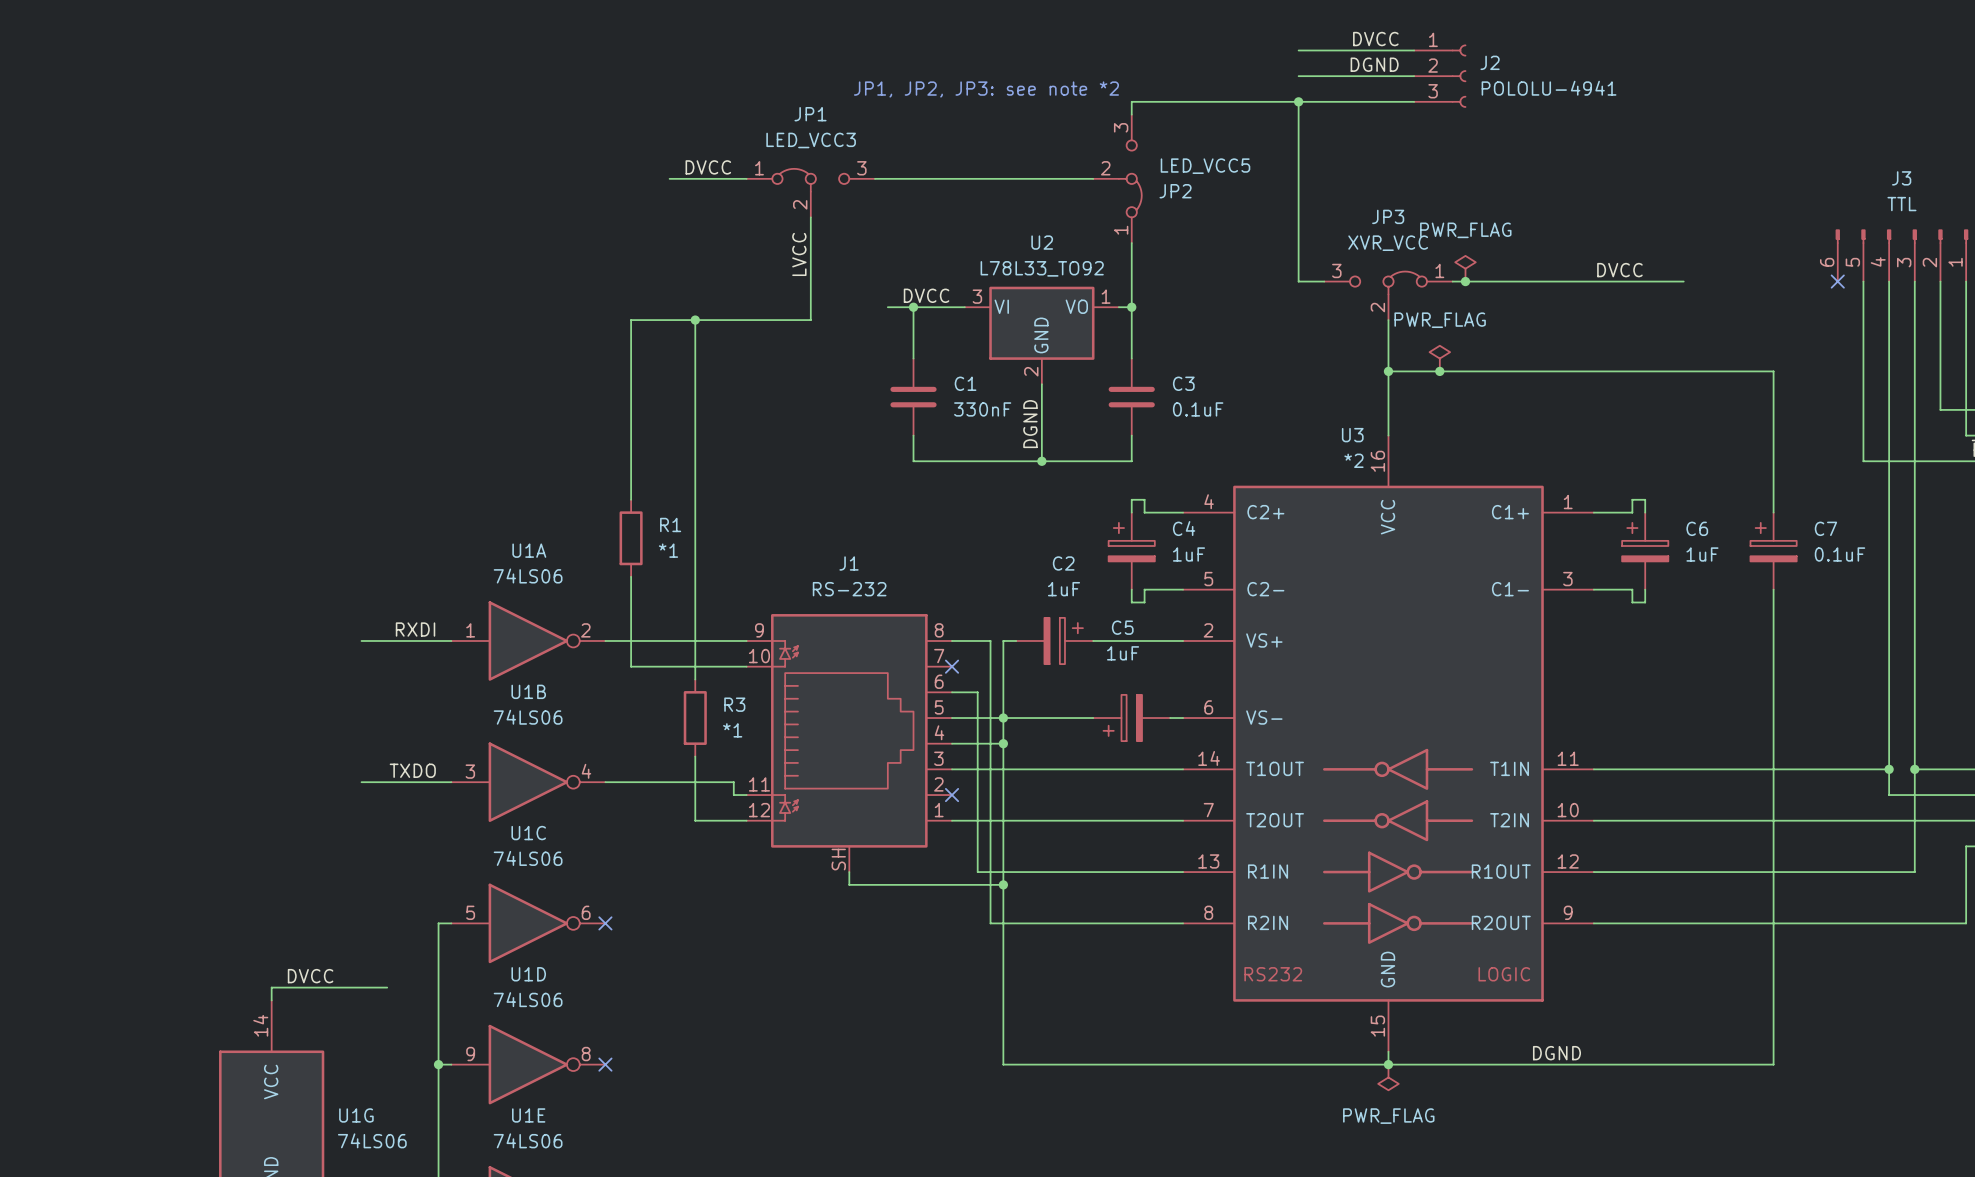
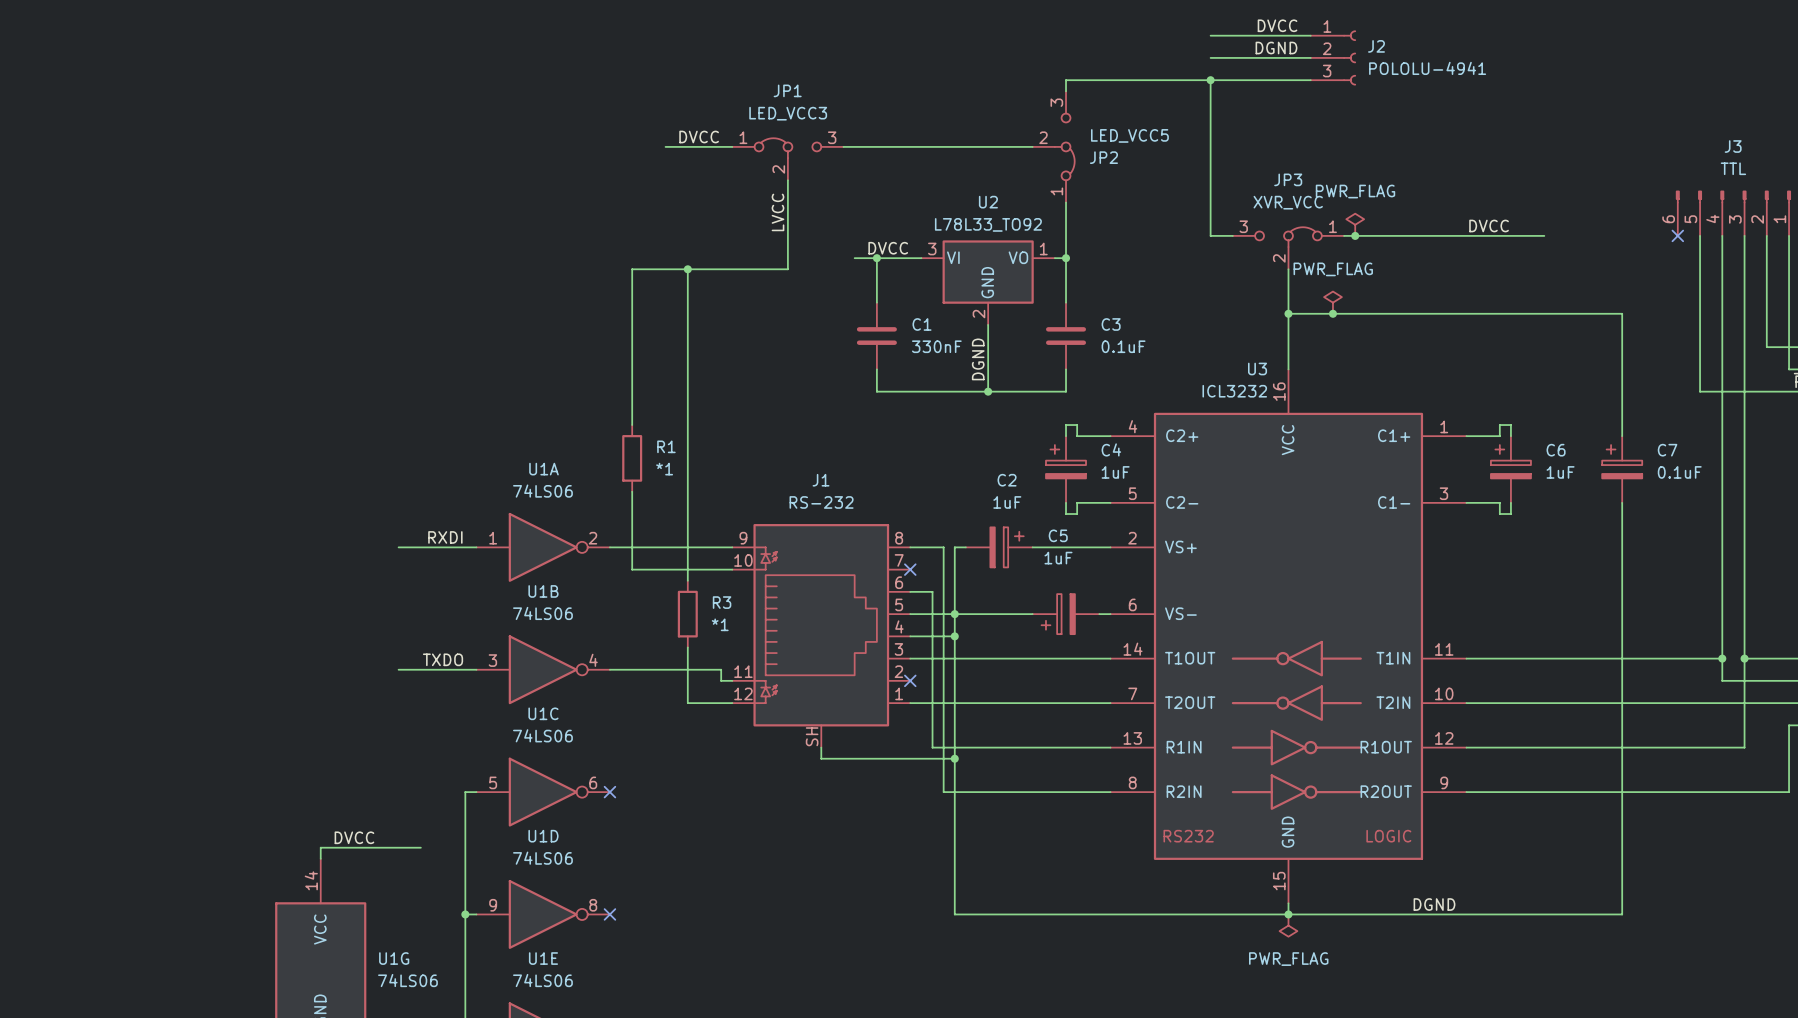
text: JP1, JP2, JP3: see note *2 (986, 89) -> none
U3 value: *2 (1353, 460) -> ICL3232 (1234, 391)

